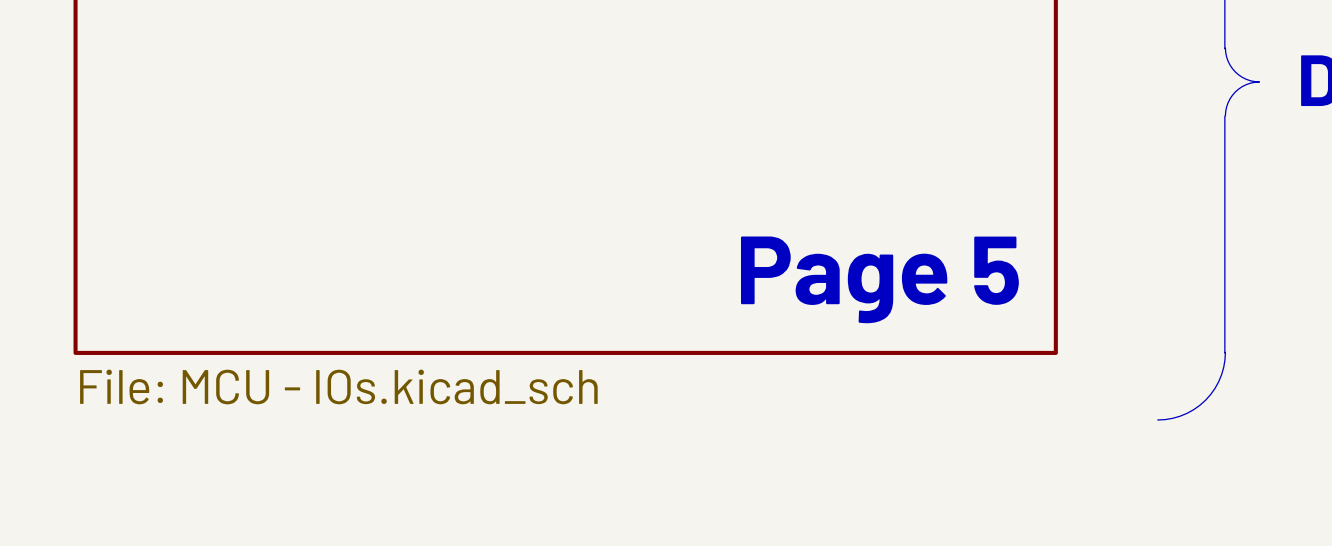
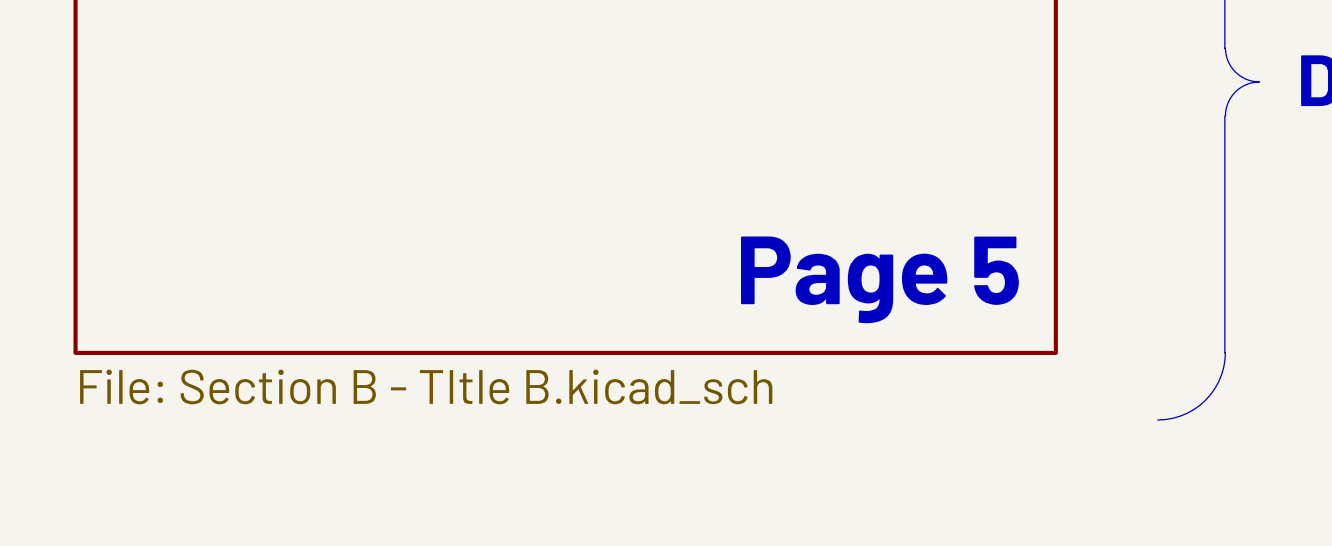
sheet value: File: MCU - IOs.kicad_sch (338, 386) -> File: Section B - TItle B.kicad_sch (426, 386)

